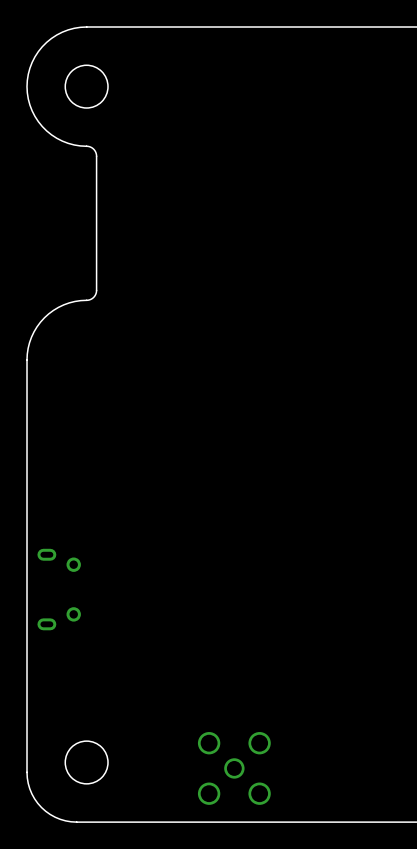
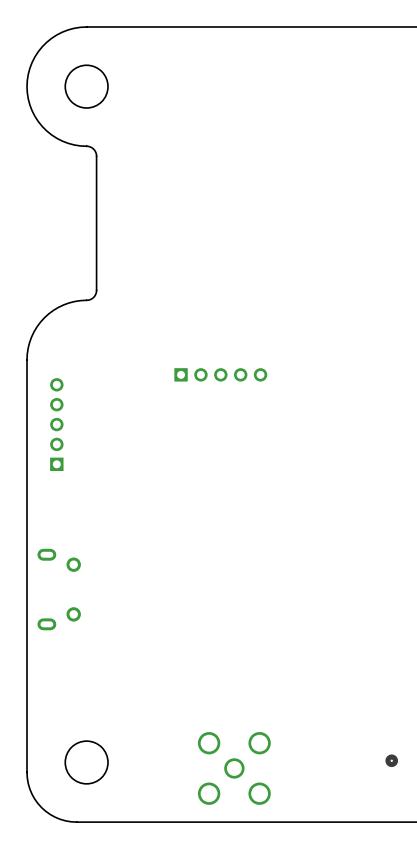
part: none -> (220, 374)
part: none -> (56, 424)
part: none -> (391, 760)

